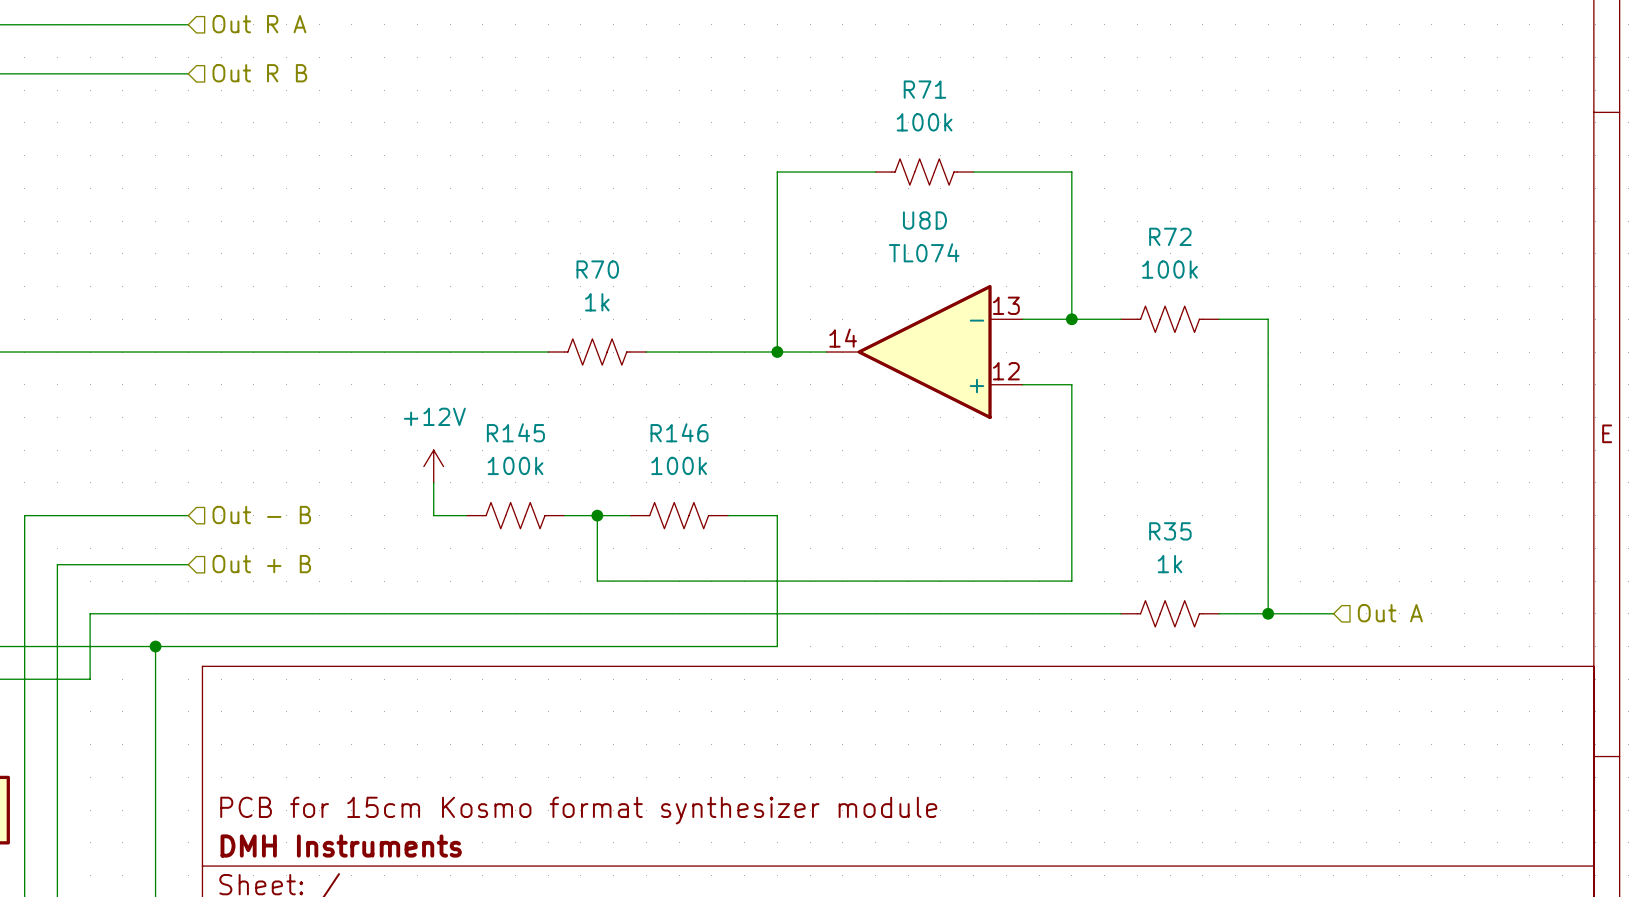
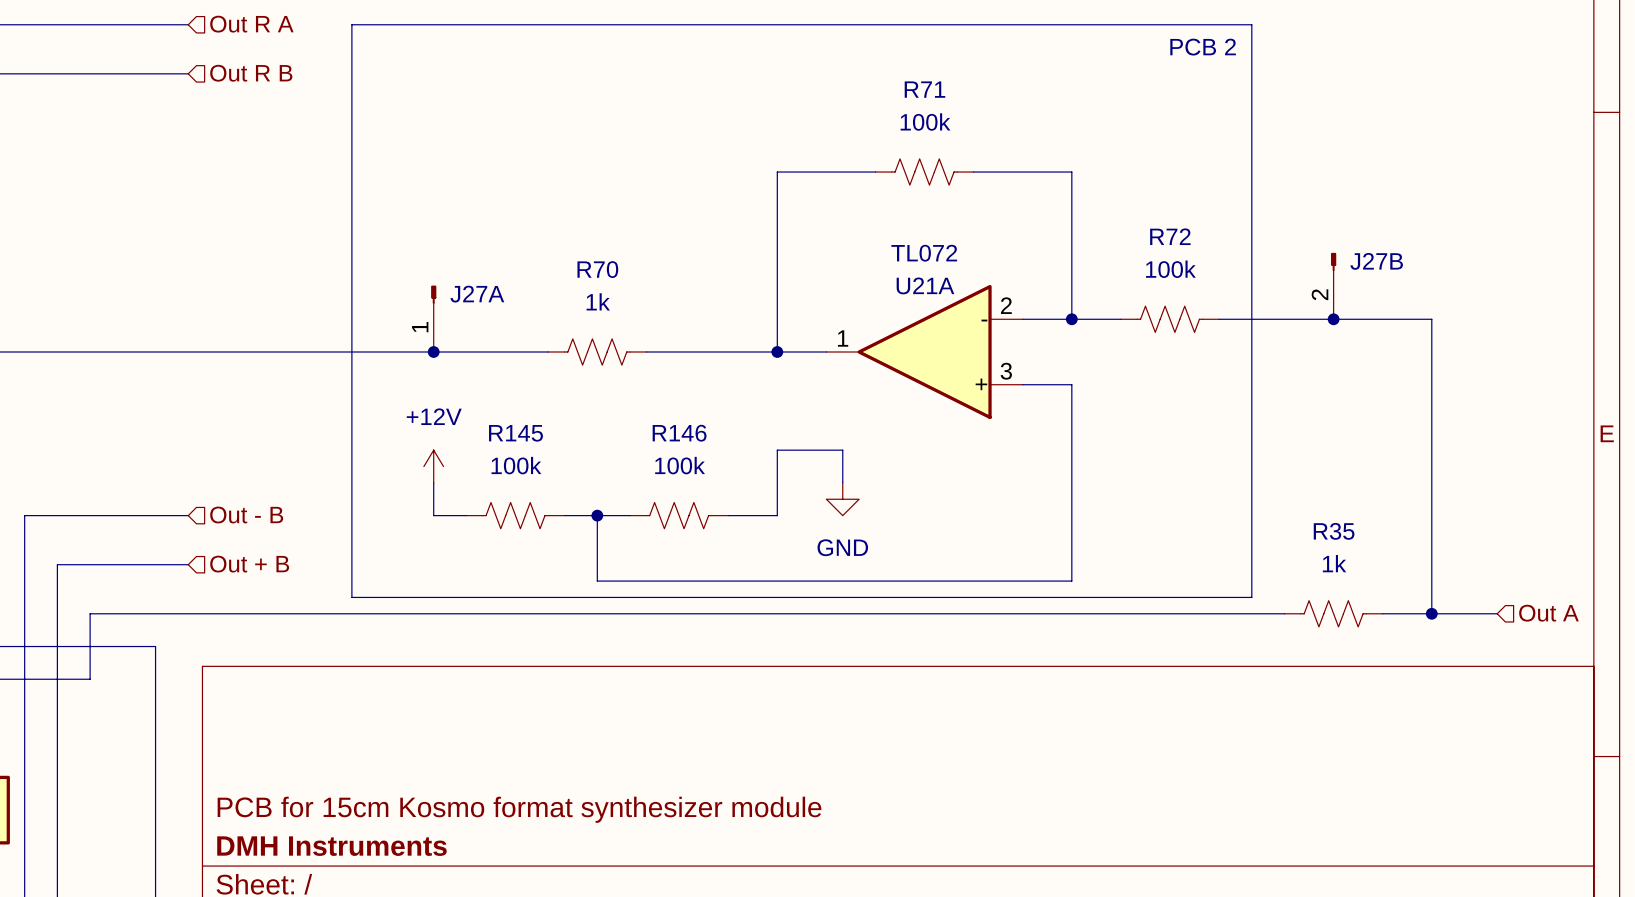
line: none -> (351, 24) (1251, 24) (1251, 597) (351, 597) (351, 24)
text: none -> PCB 2 (1203, 47)
U8D name: U8D (924, 220) -> U21A (925, 285)
U8D value: TL074 (924, 252) -> TL072 (924, 253)
J27B: none -> (1333, 286)
U8D pin number: 13 (1006, 305) -> 2 (1006, 305)
J27A: none -> (433, 318)
wire: (1268, 319) (1268, 613) -> (1268, 319) (1431, 319) (1431, 613)
junction: none -> (1333, 319)
U8D pin number: 14 (843, 338) -> 1 (843, 338)
junction: none -> (433, 352)
U8D pin number: 12 (1006, 371) -> 3 (1006, 371)
power symbol: none -> GND (842, 499)
wire: (777, 515) (777, 646) (155, 646) -> (777, 515) (777, 450) (842, 450) (842, 482)
wire: none -> (1120, 613) (1219, 613)
R35 position: (1170, 613) -> (1333, 613)
junction: (1268, 613) -> none
wire: (1284, 613) (1333, 613) -> none
wire: none -> (1382, 613) (1497, 613)
hierarchical label position: Out A (1390, 613) -> Out A (1548, 613)
junction: none -> (1431, 613)
junction: (155, 646) -> none

